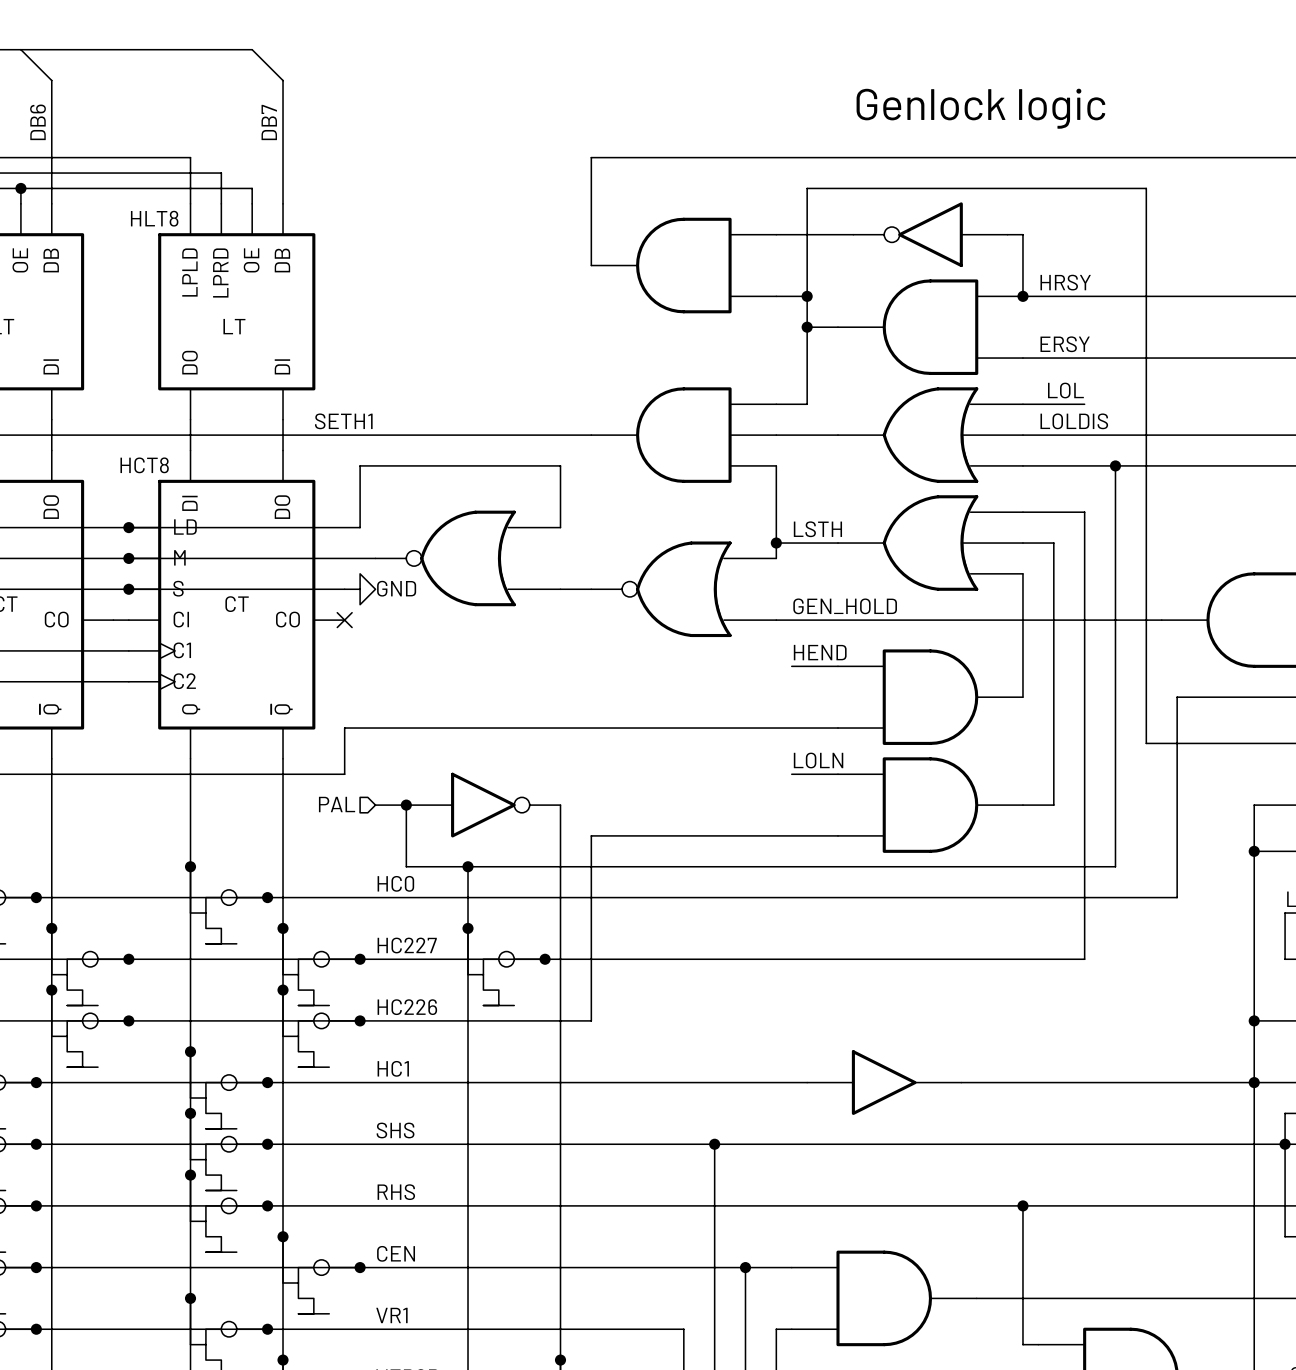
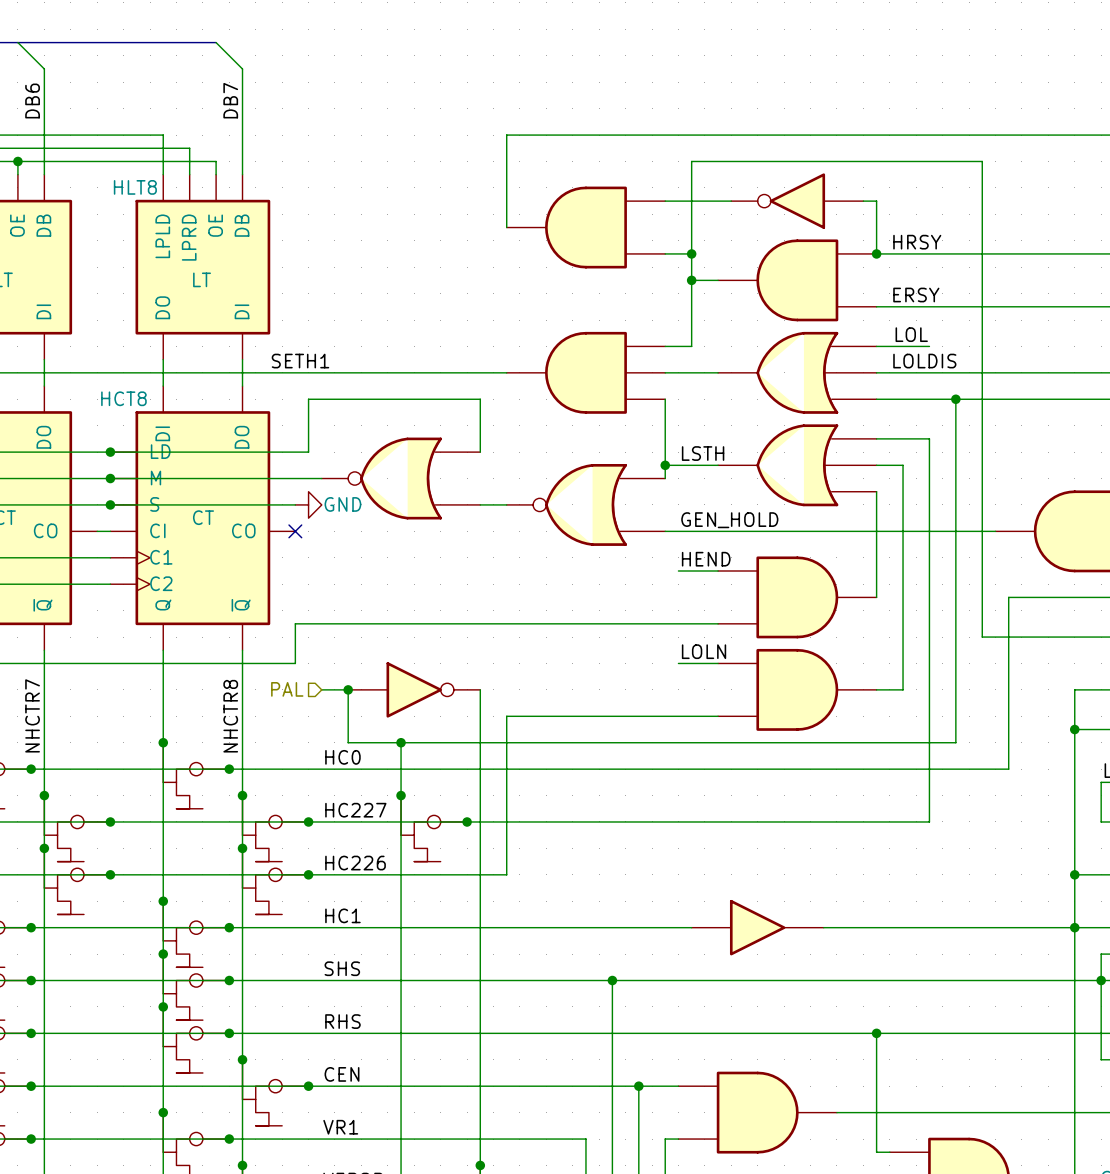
text: Genlock logic (980, 108) -> none
label: none -> NHCTR7 (32, 715)
label: none -> NHCTR8 (230, 716)

